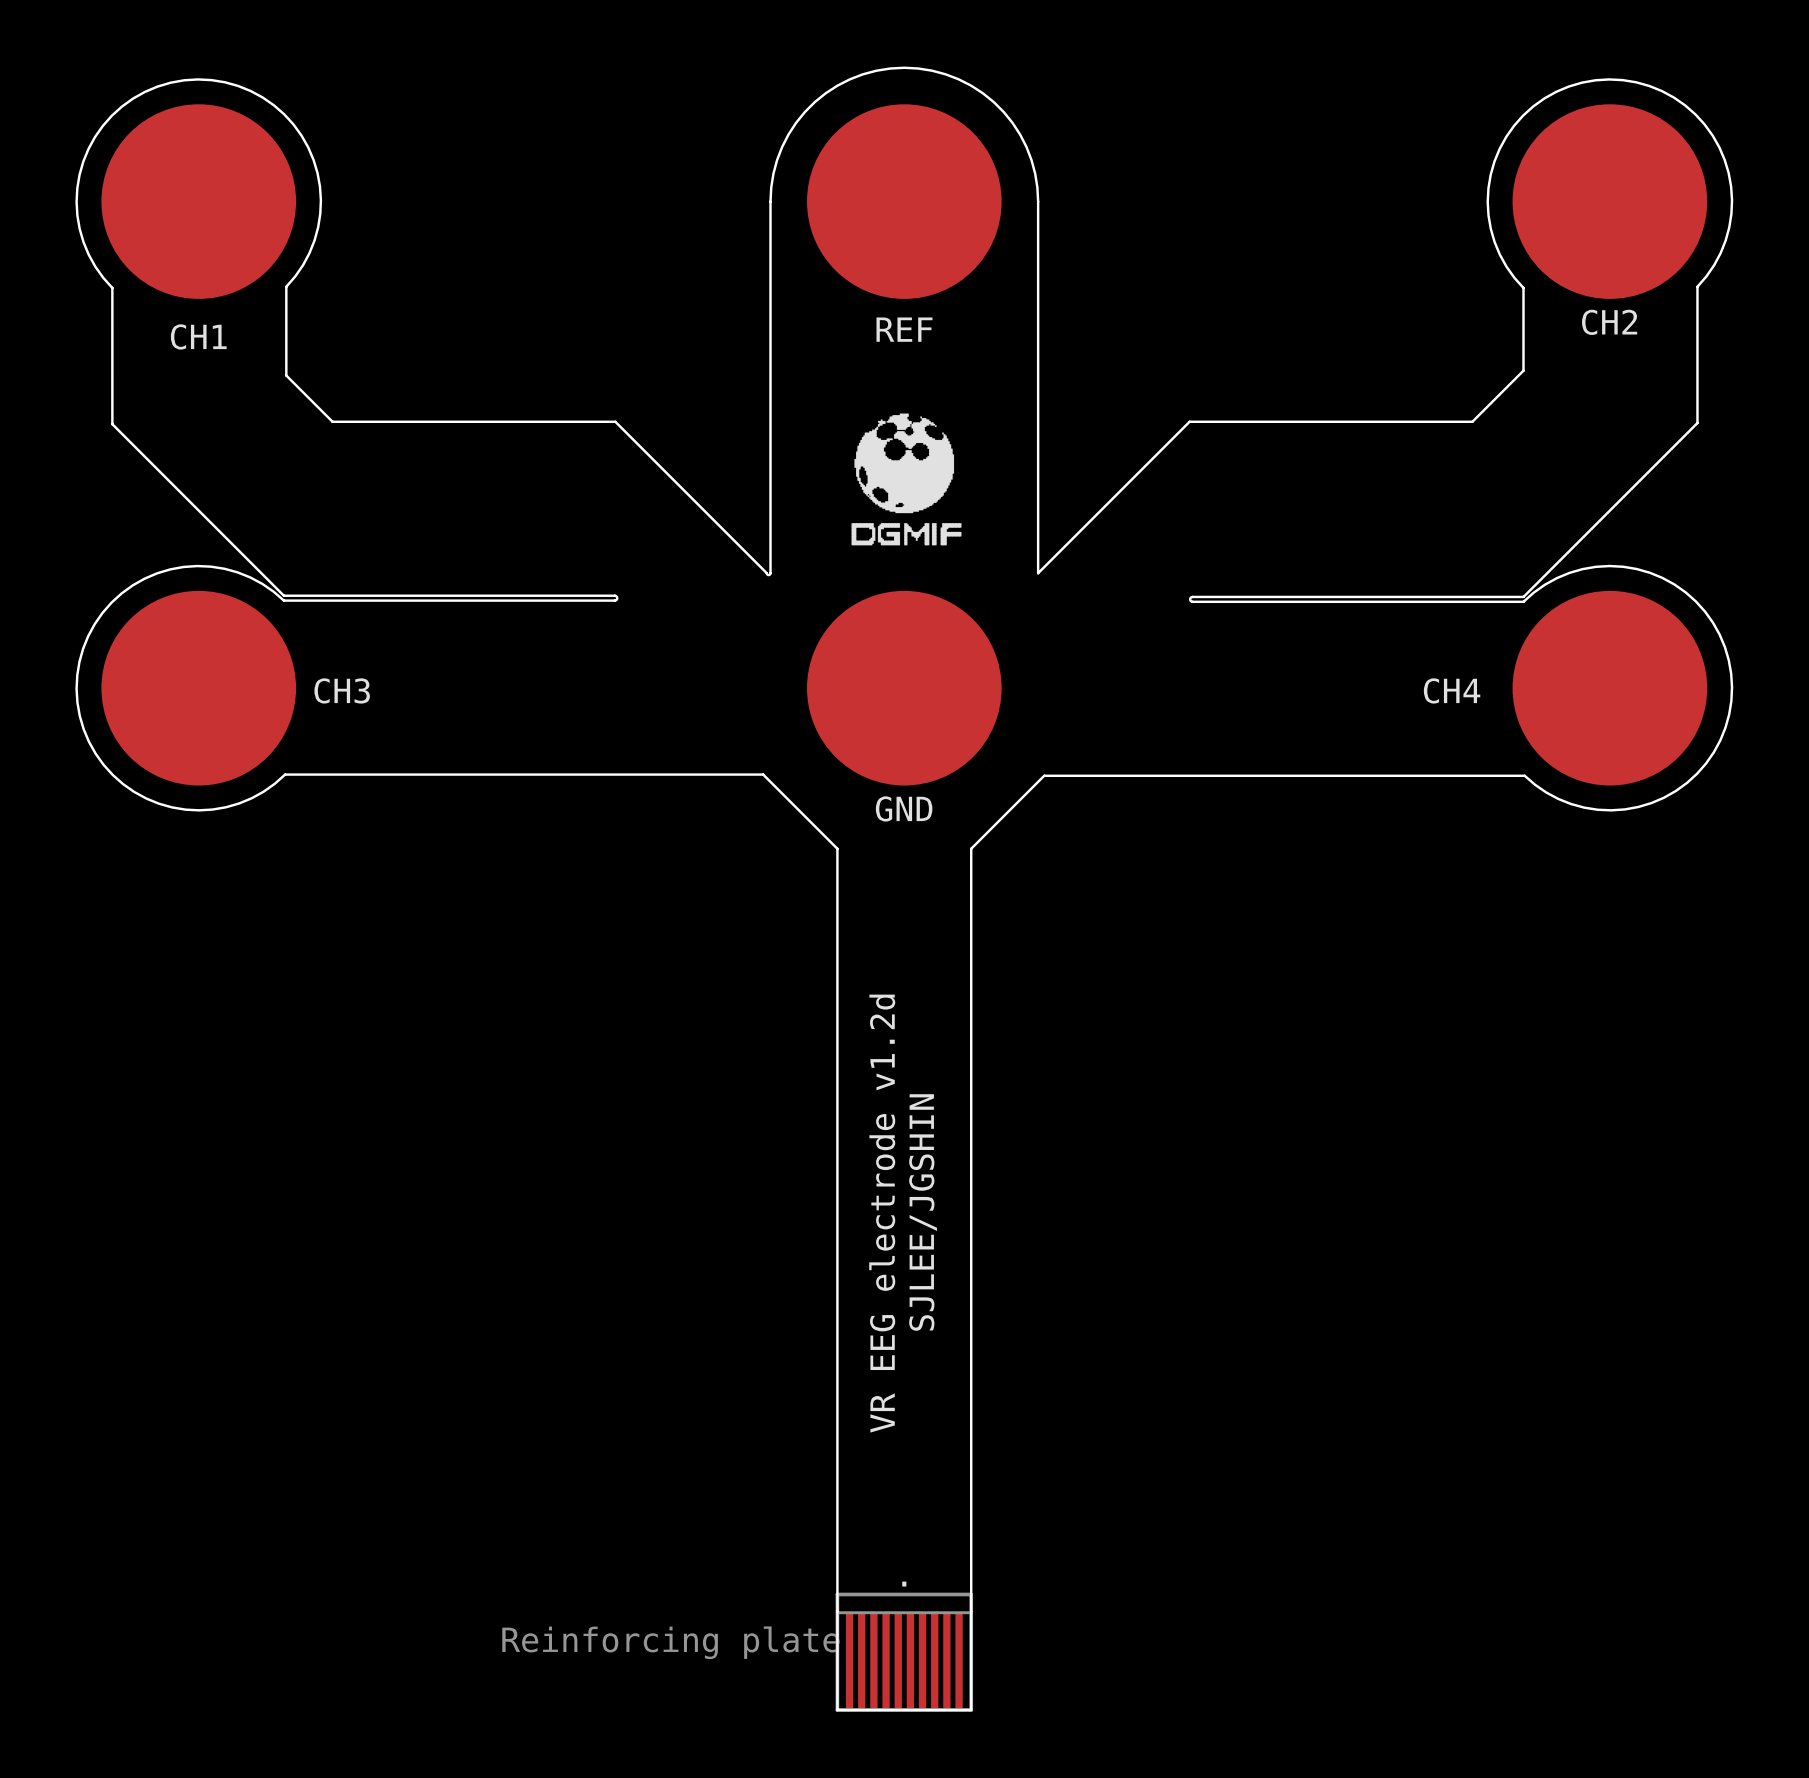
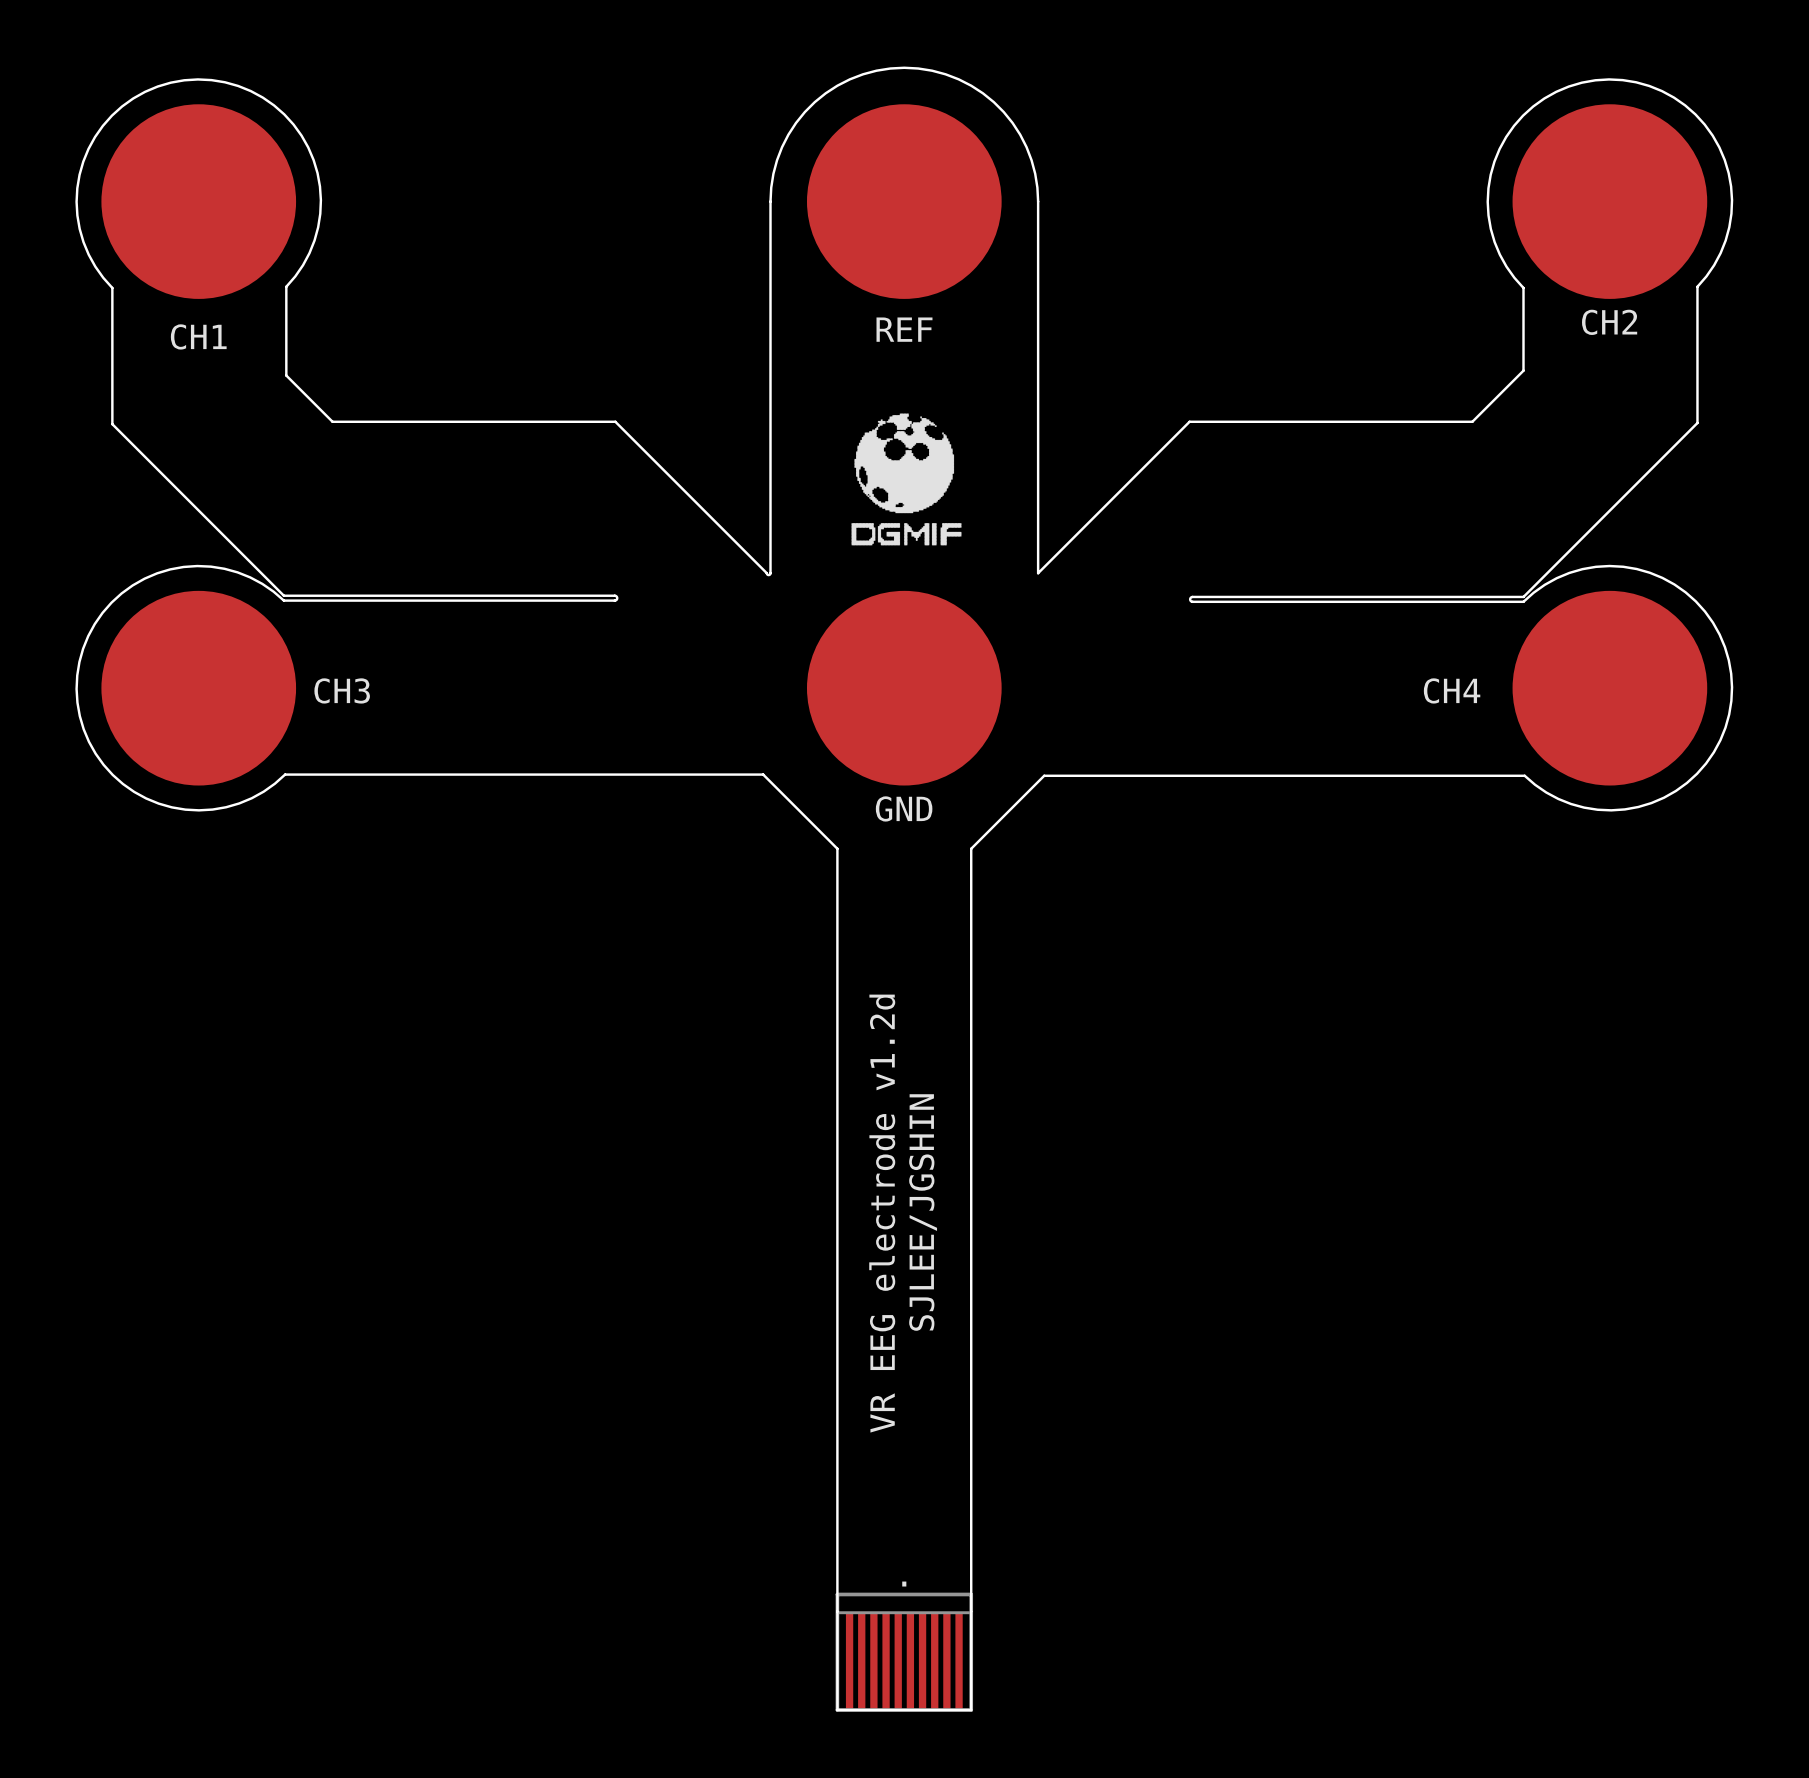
text: Reinforcing plate (670, 1642) -> none

